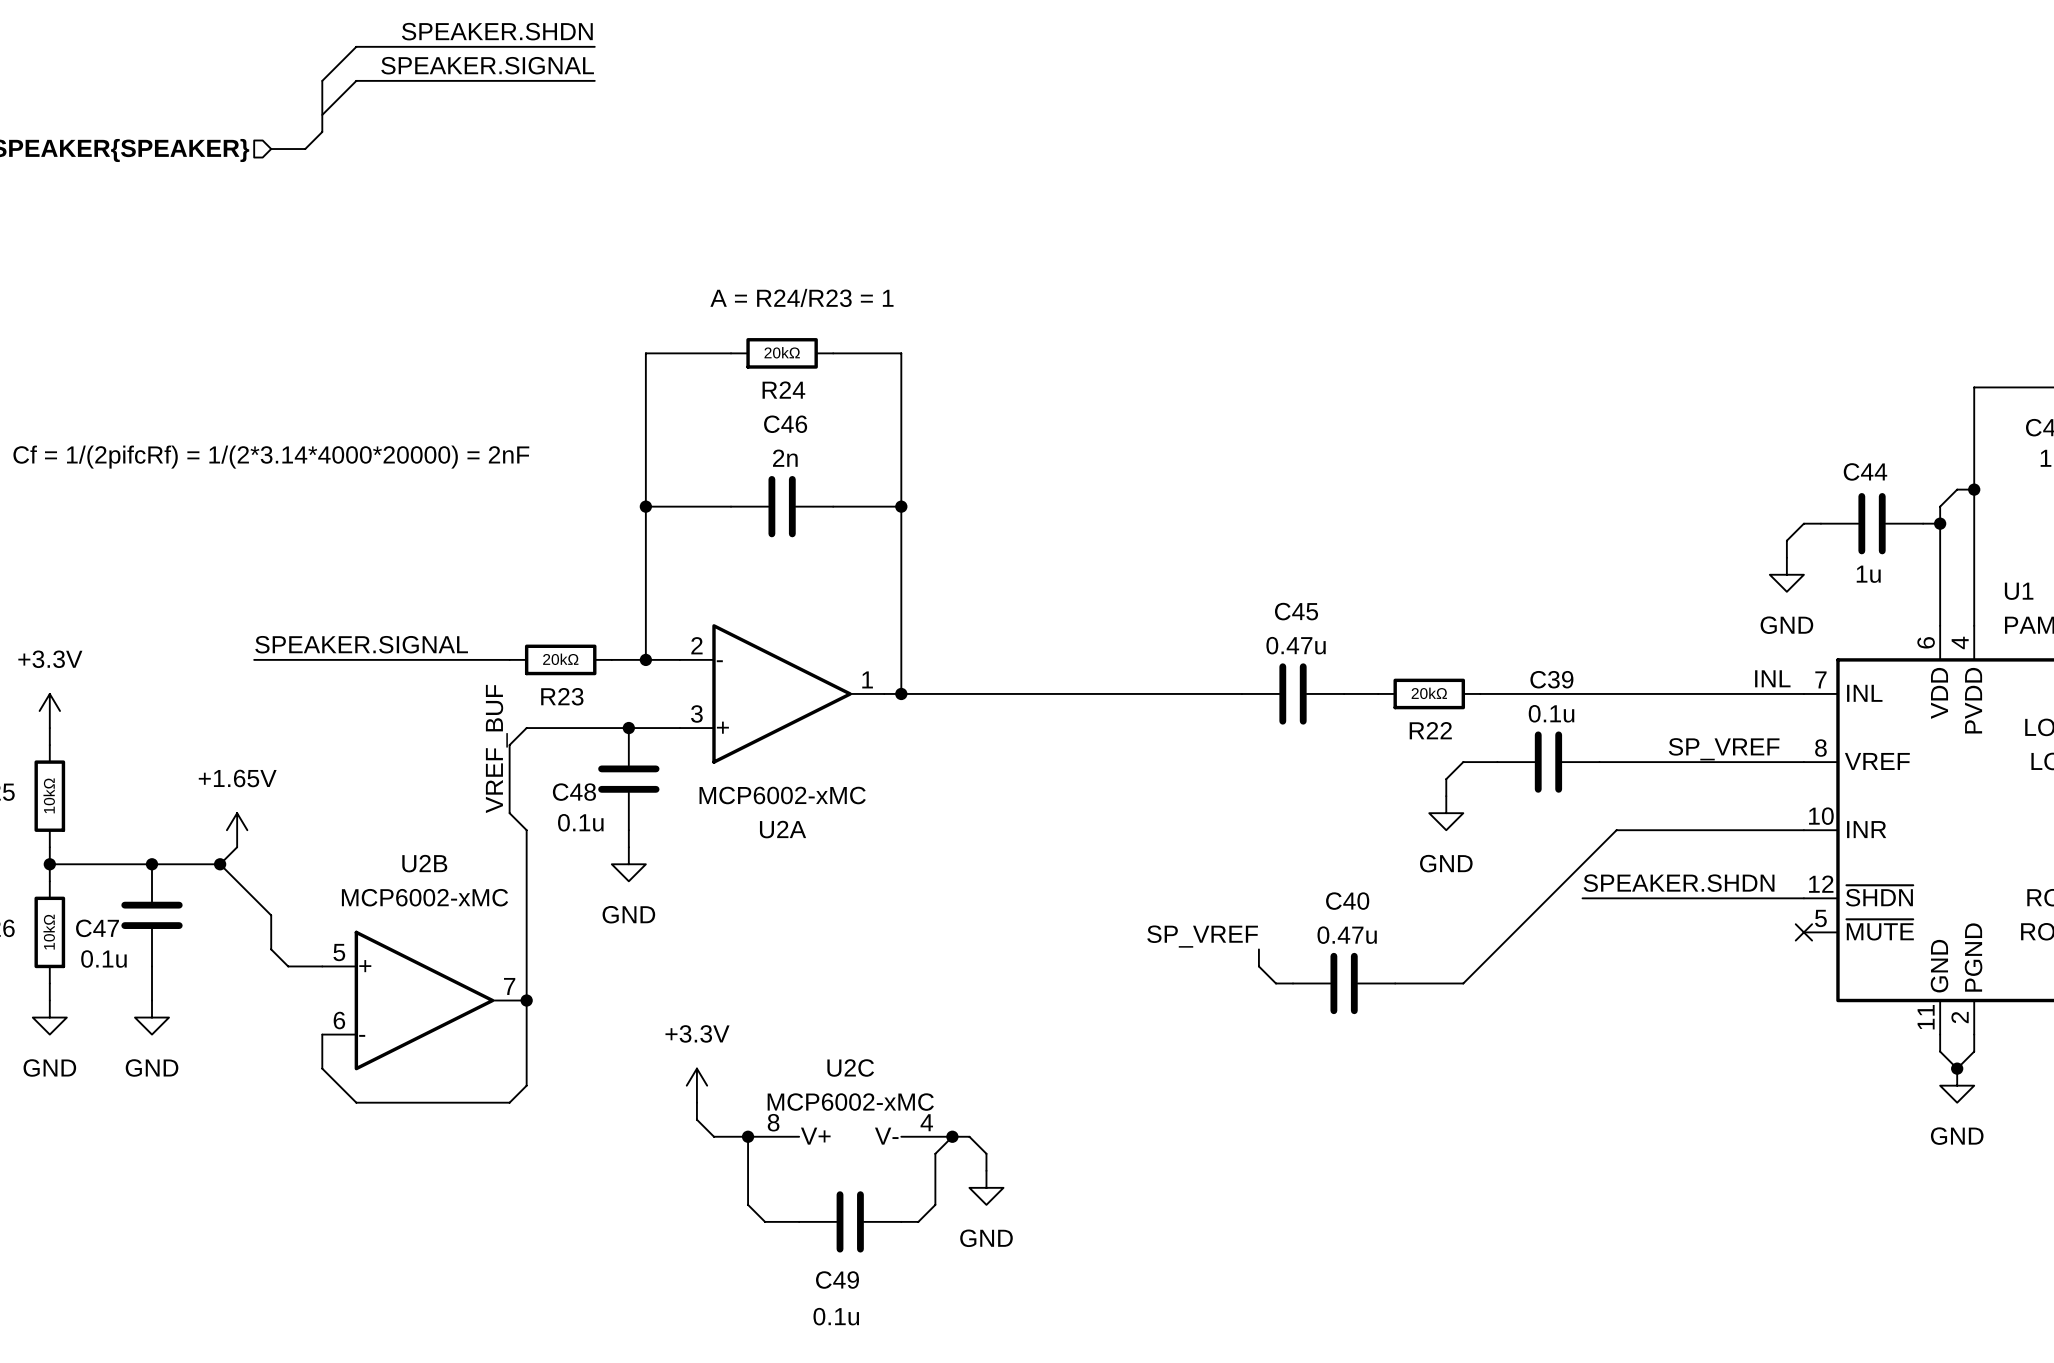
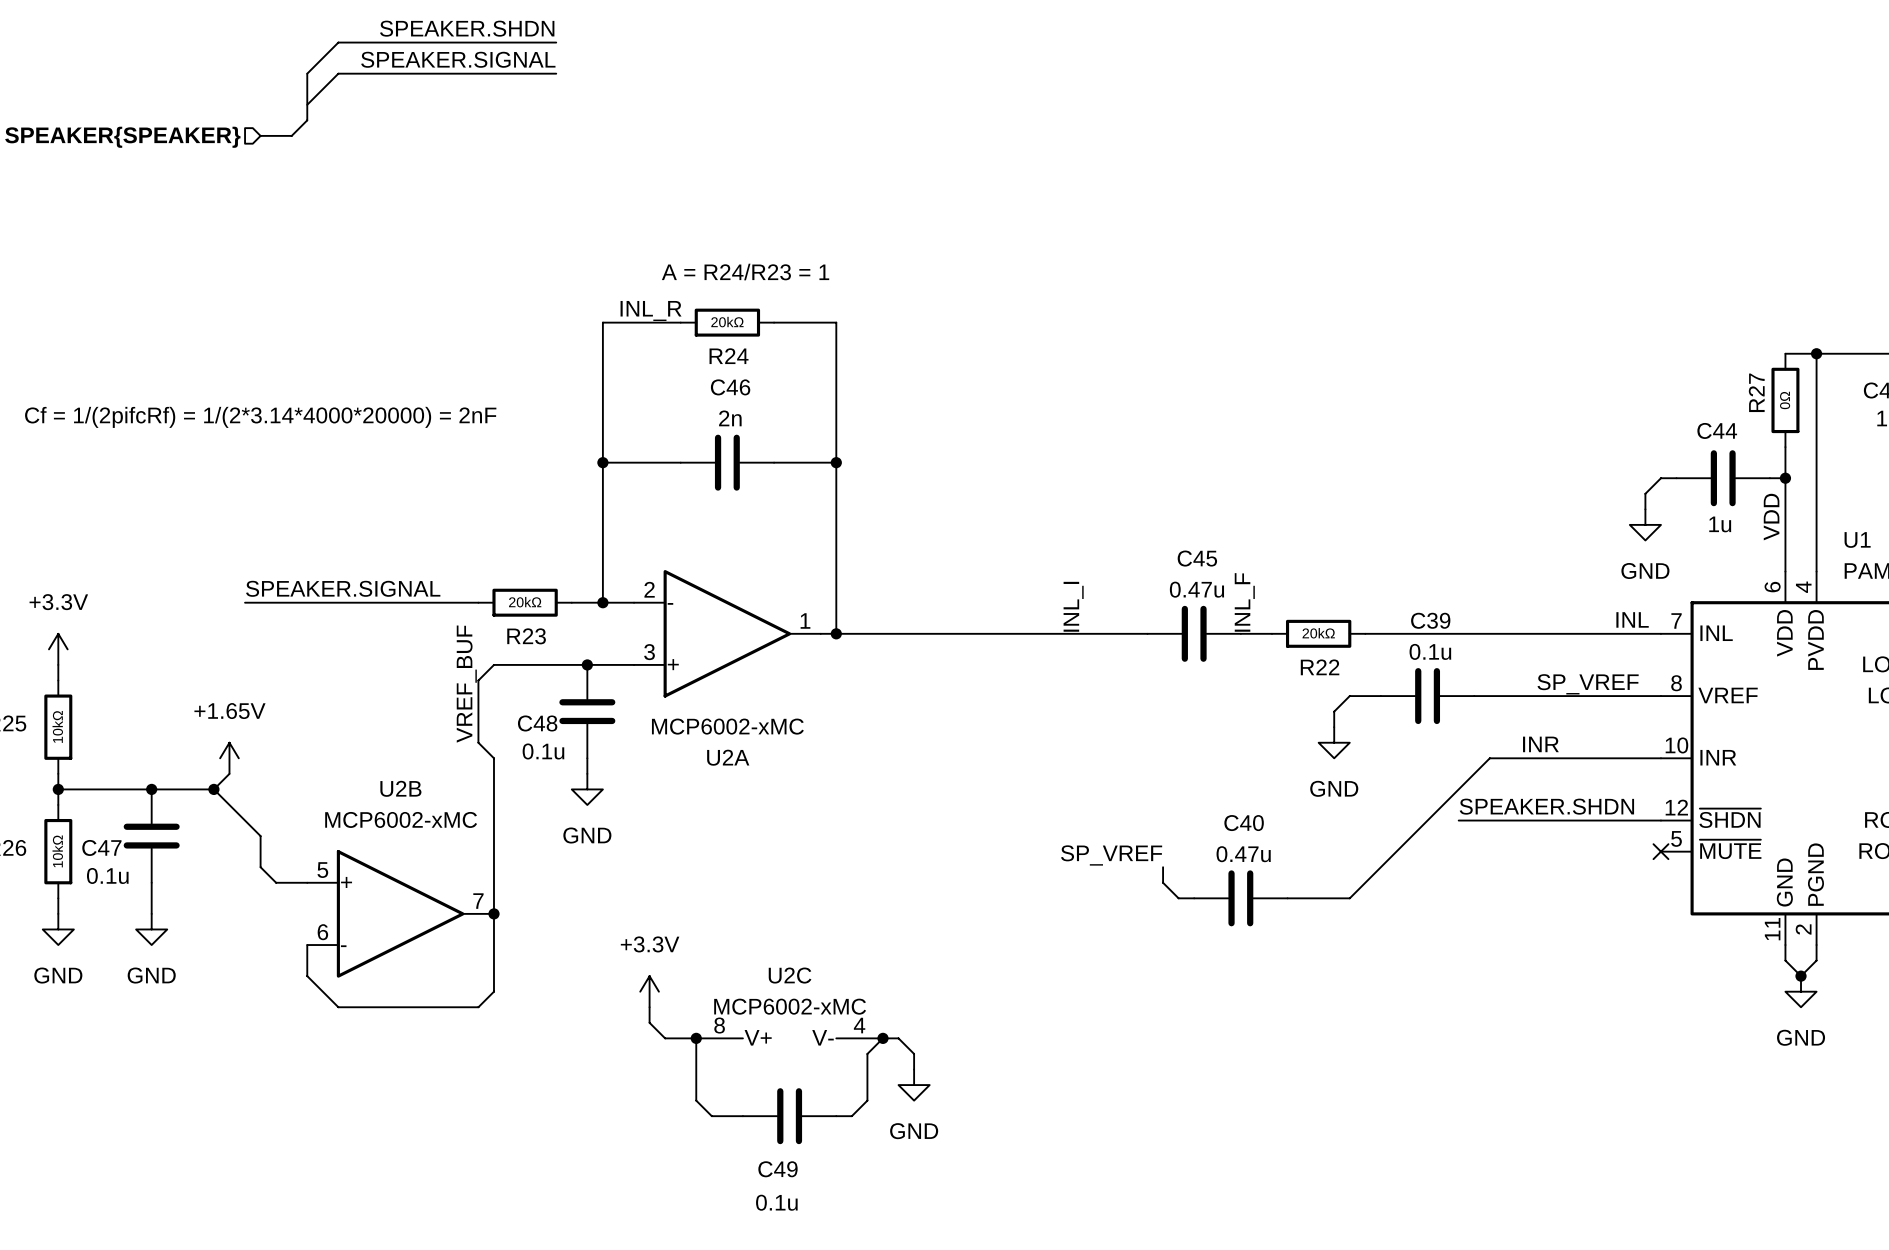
label: none -> INL_R (651, 310)
wire: none -> (1785, 353) (1816, 353)
junction: none -> (1816, 353)
R27: none -> 0Ω (1785, 400)
wire: (1974, 489) (1957, 489) (1940, 506) -> (1785, 447) (1785, 462)
junction: (1974, 489) -> none
label: none -> VDD (1771, 517)
label: none -> INL_F (1244, 602)
label: none -> INL_I (1073, 606)
label: none -> INR (1540, 744)

